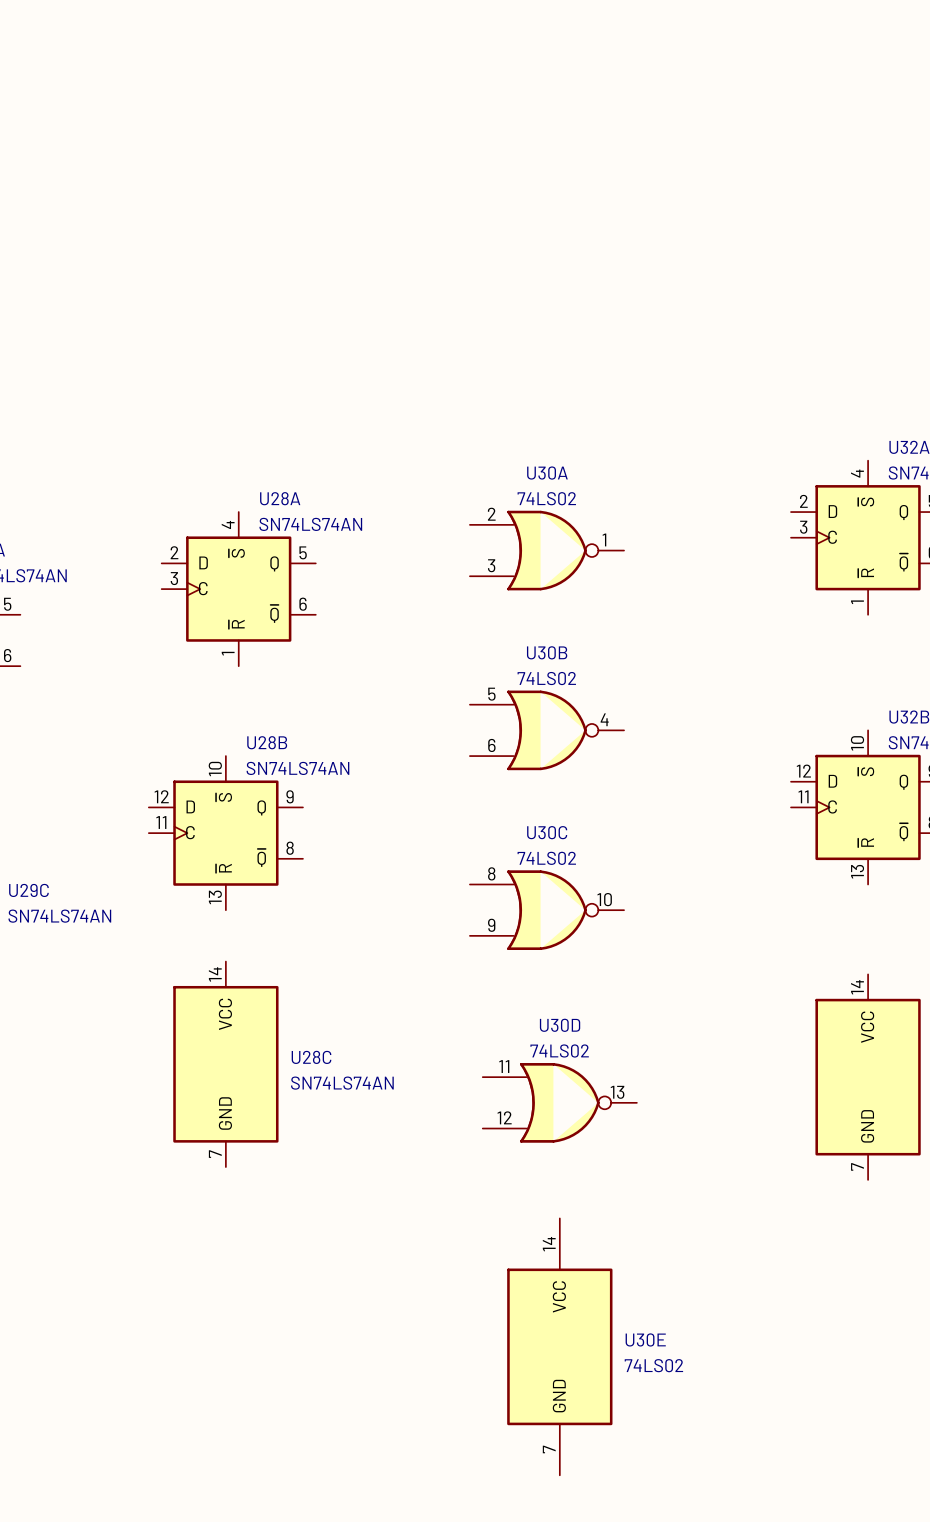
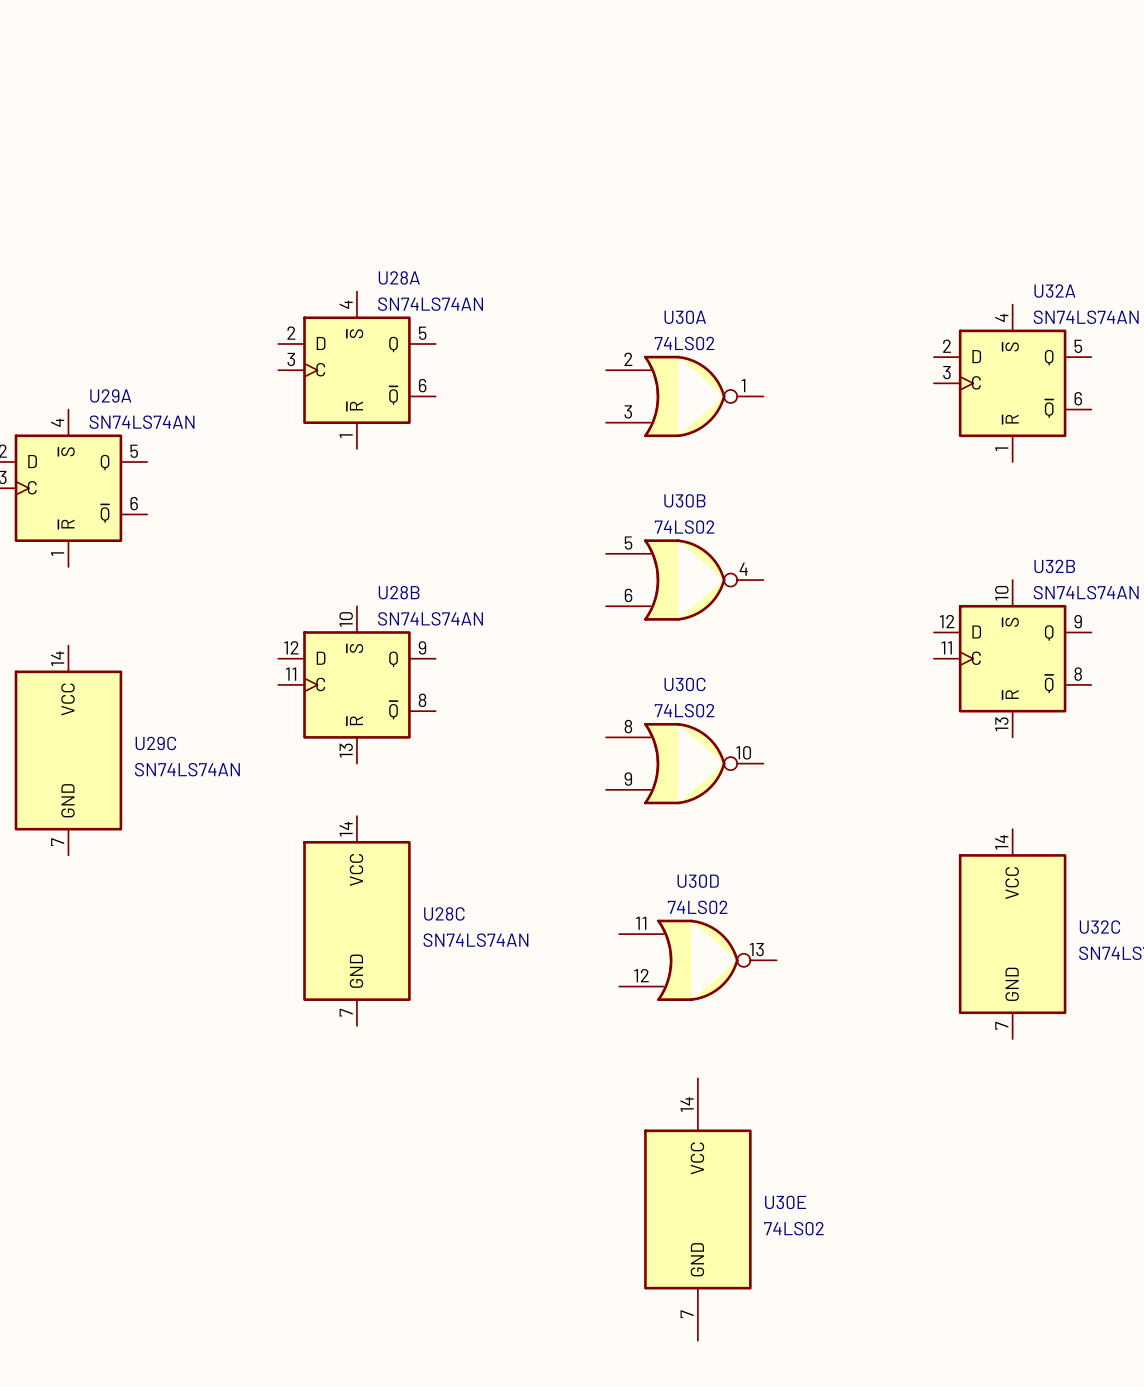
U28A position: (238, 589) -> (356, 370)

